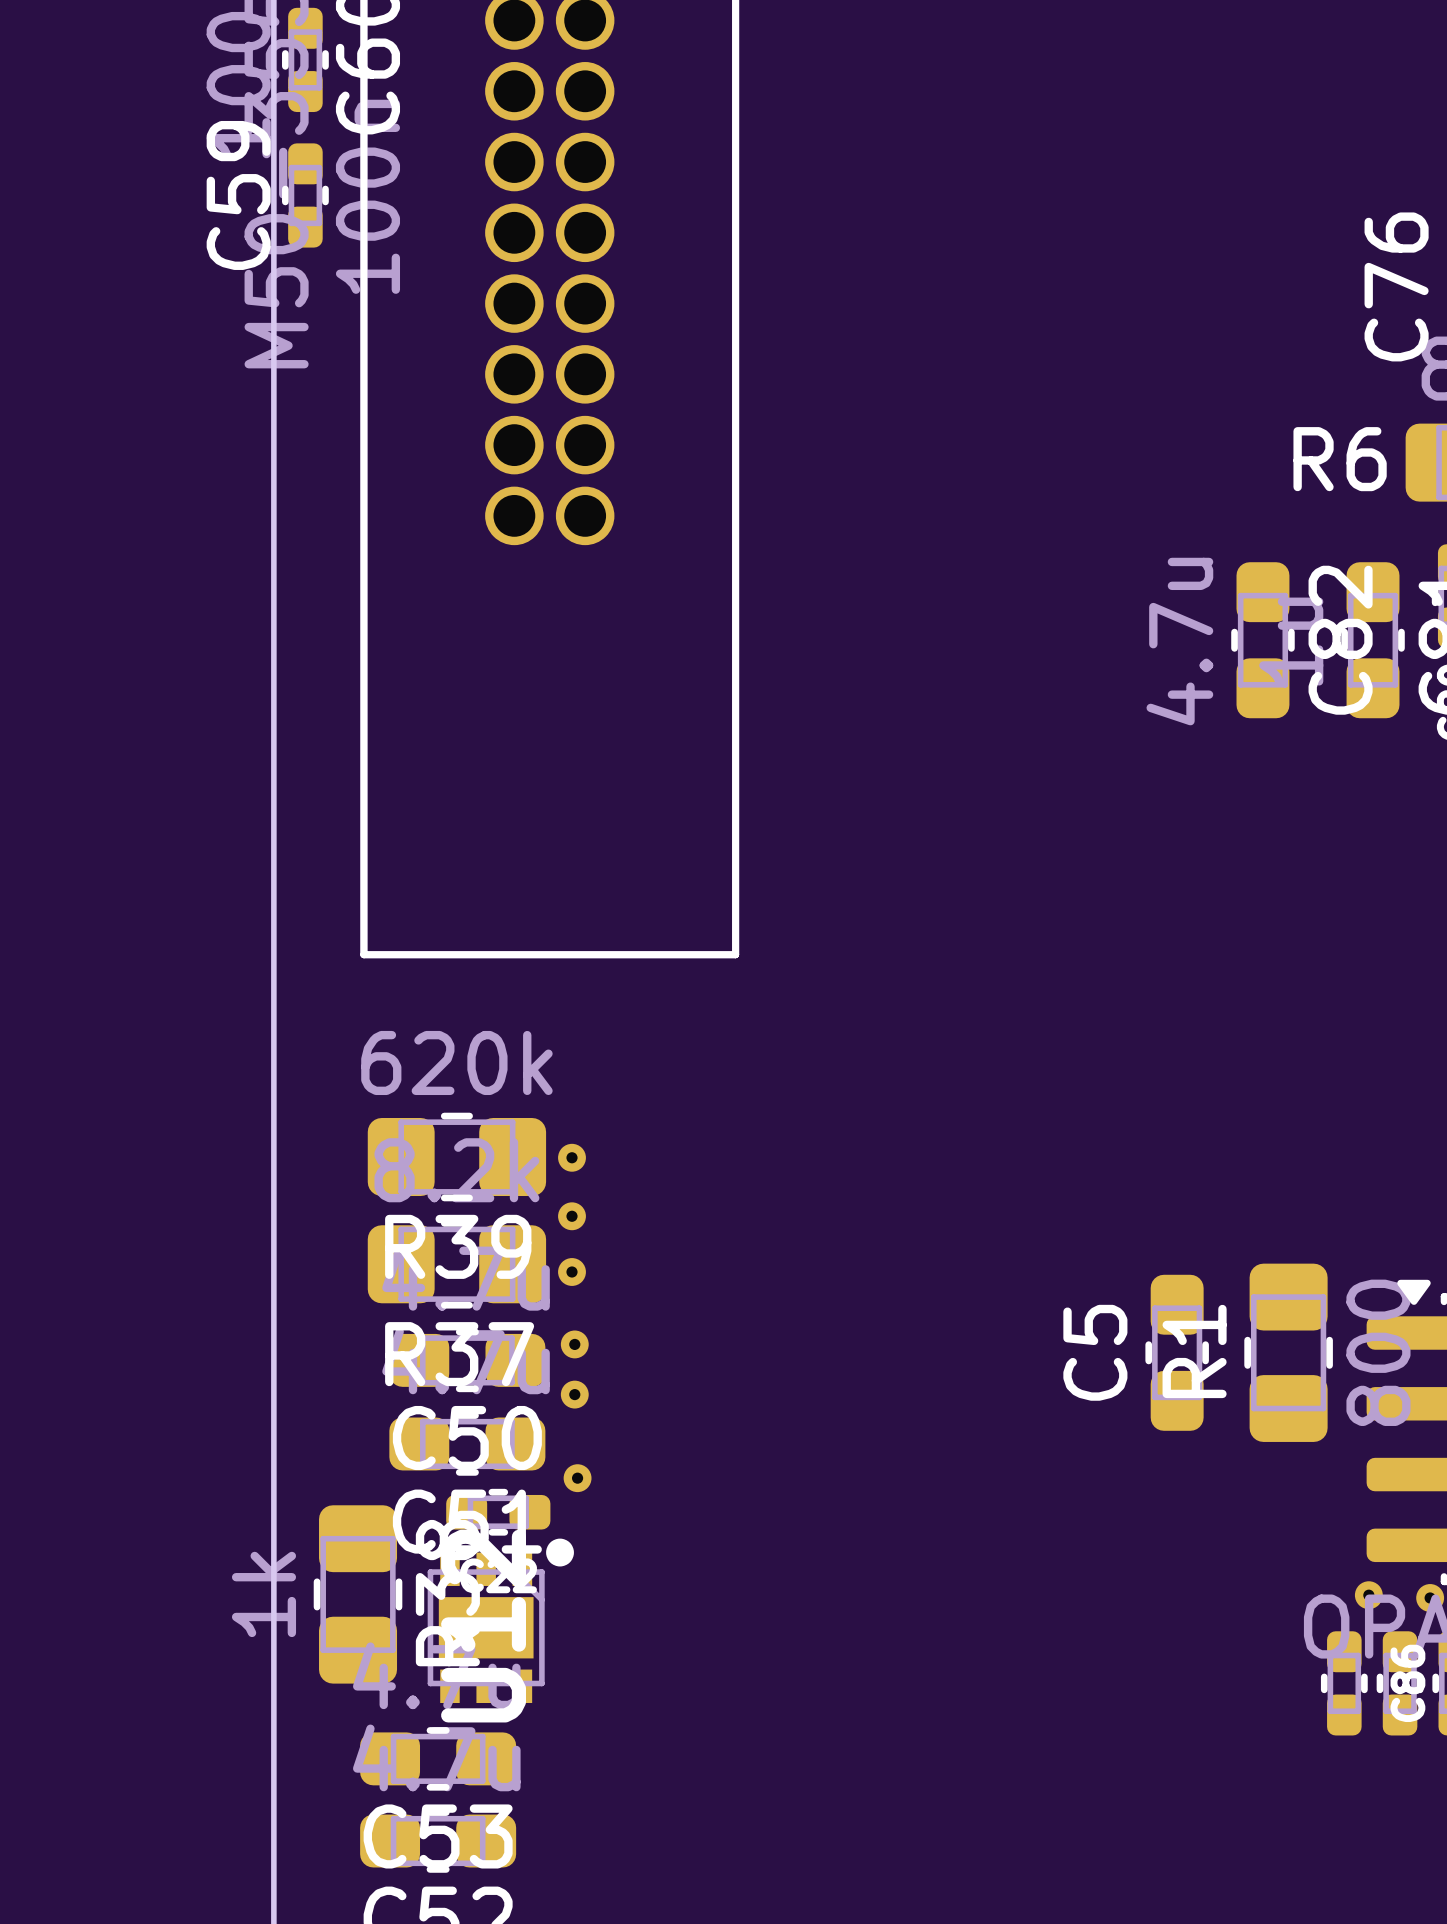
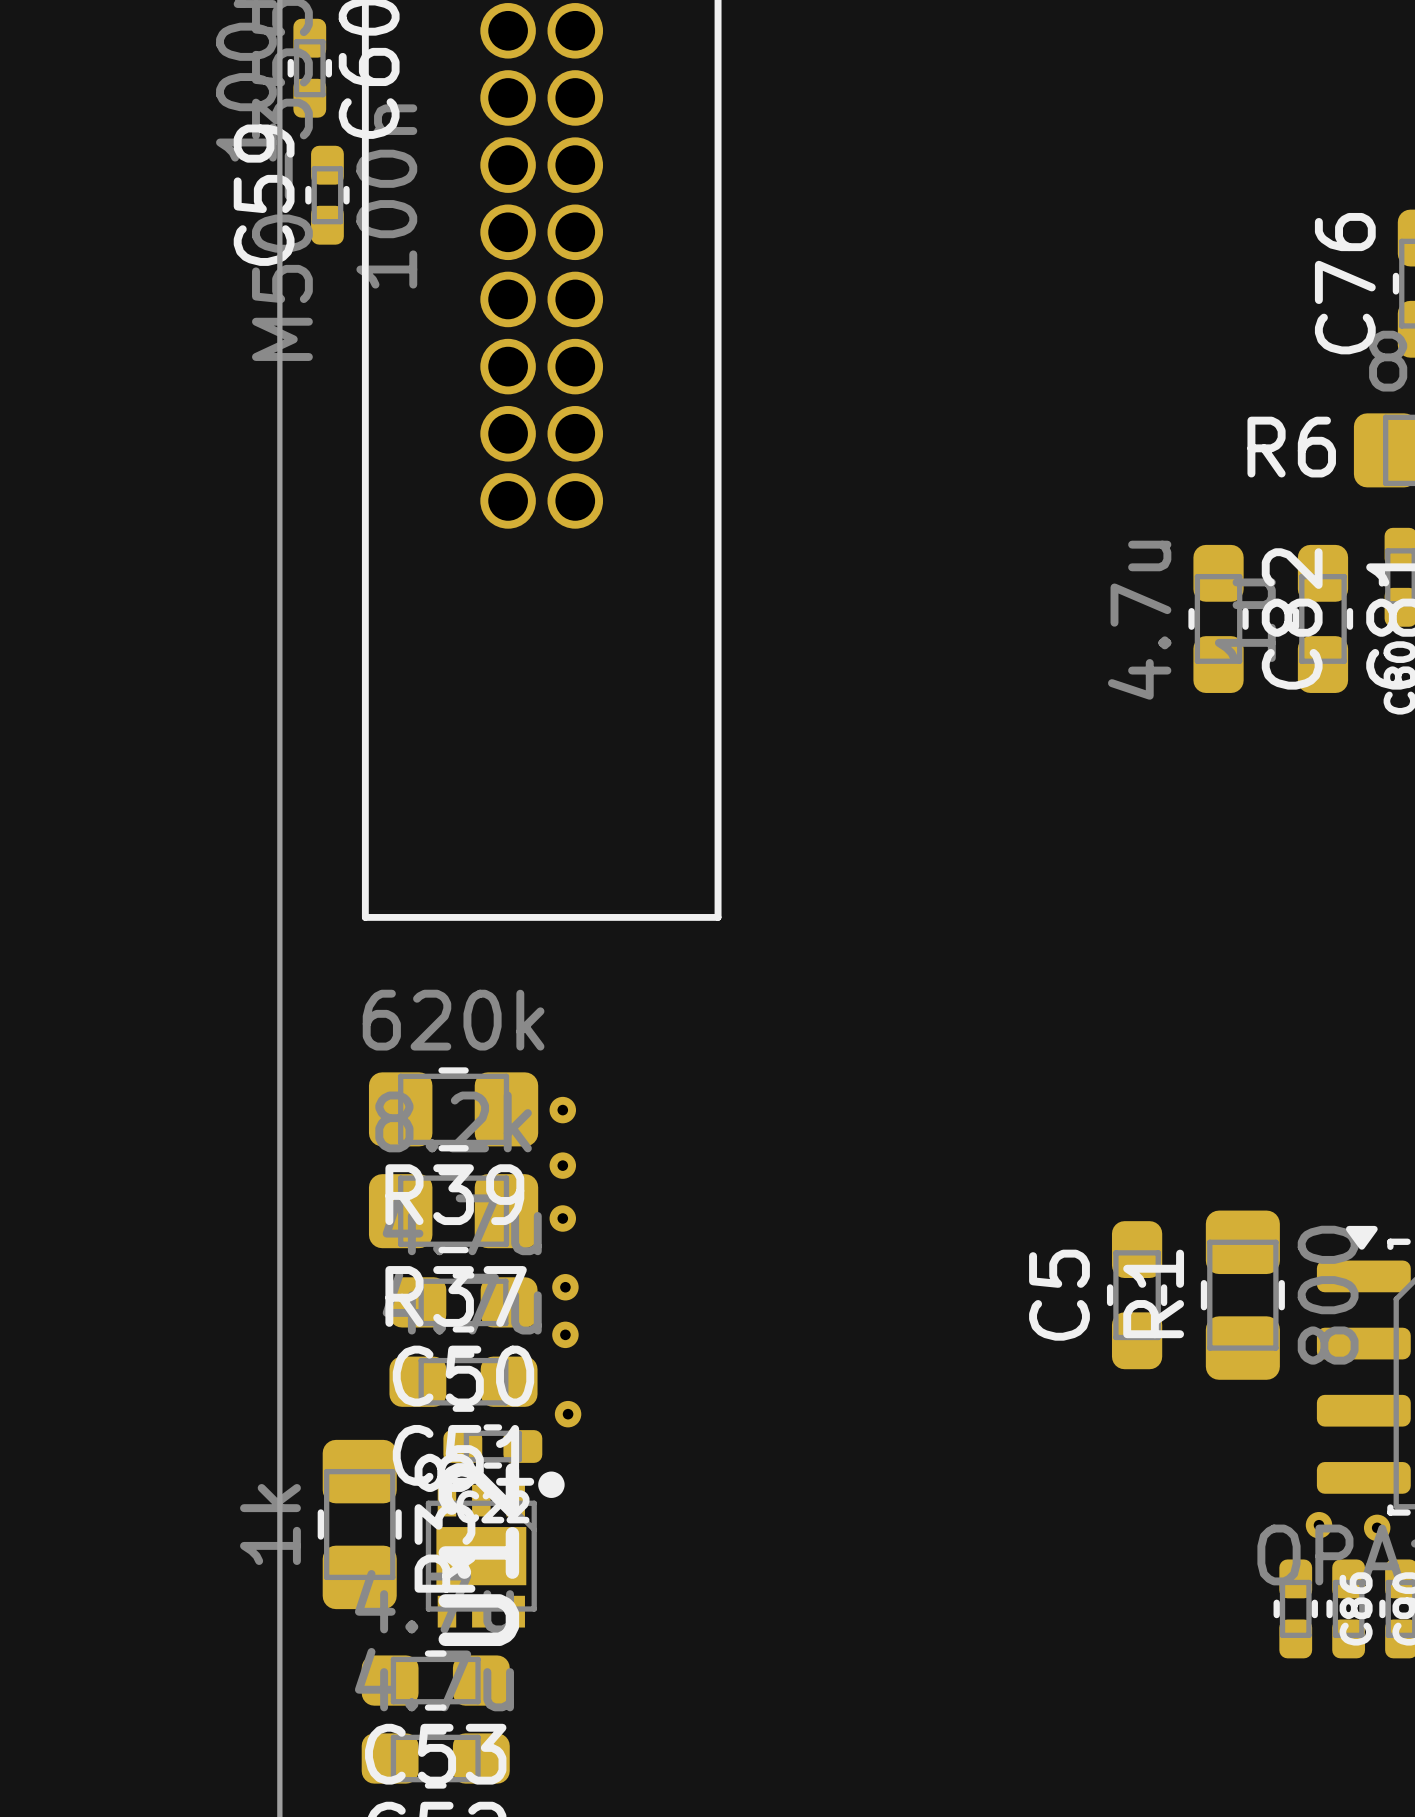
C59 position: (305, 195) -> (327, 195)

